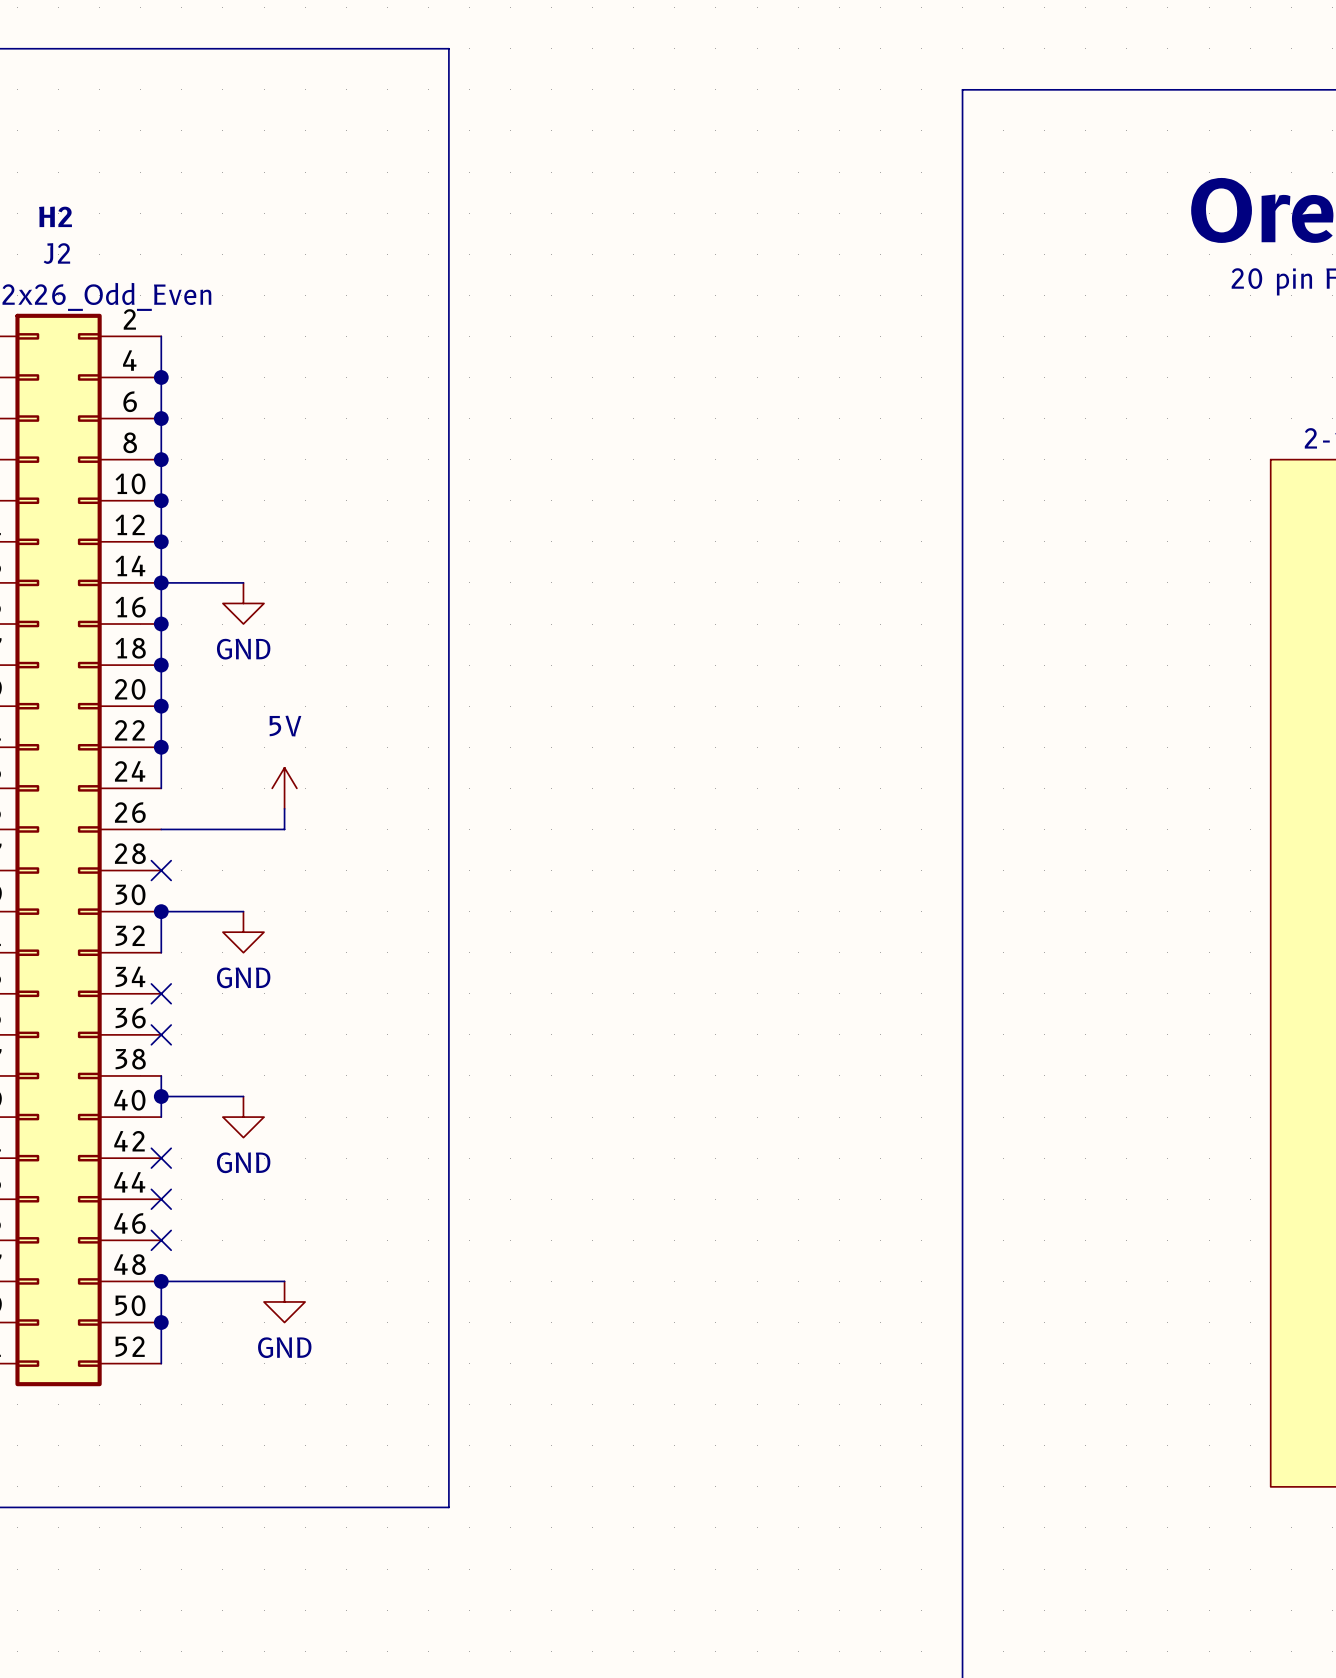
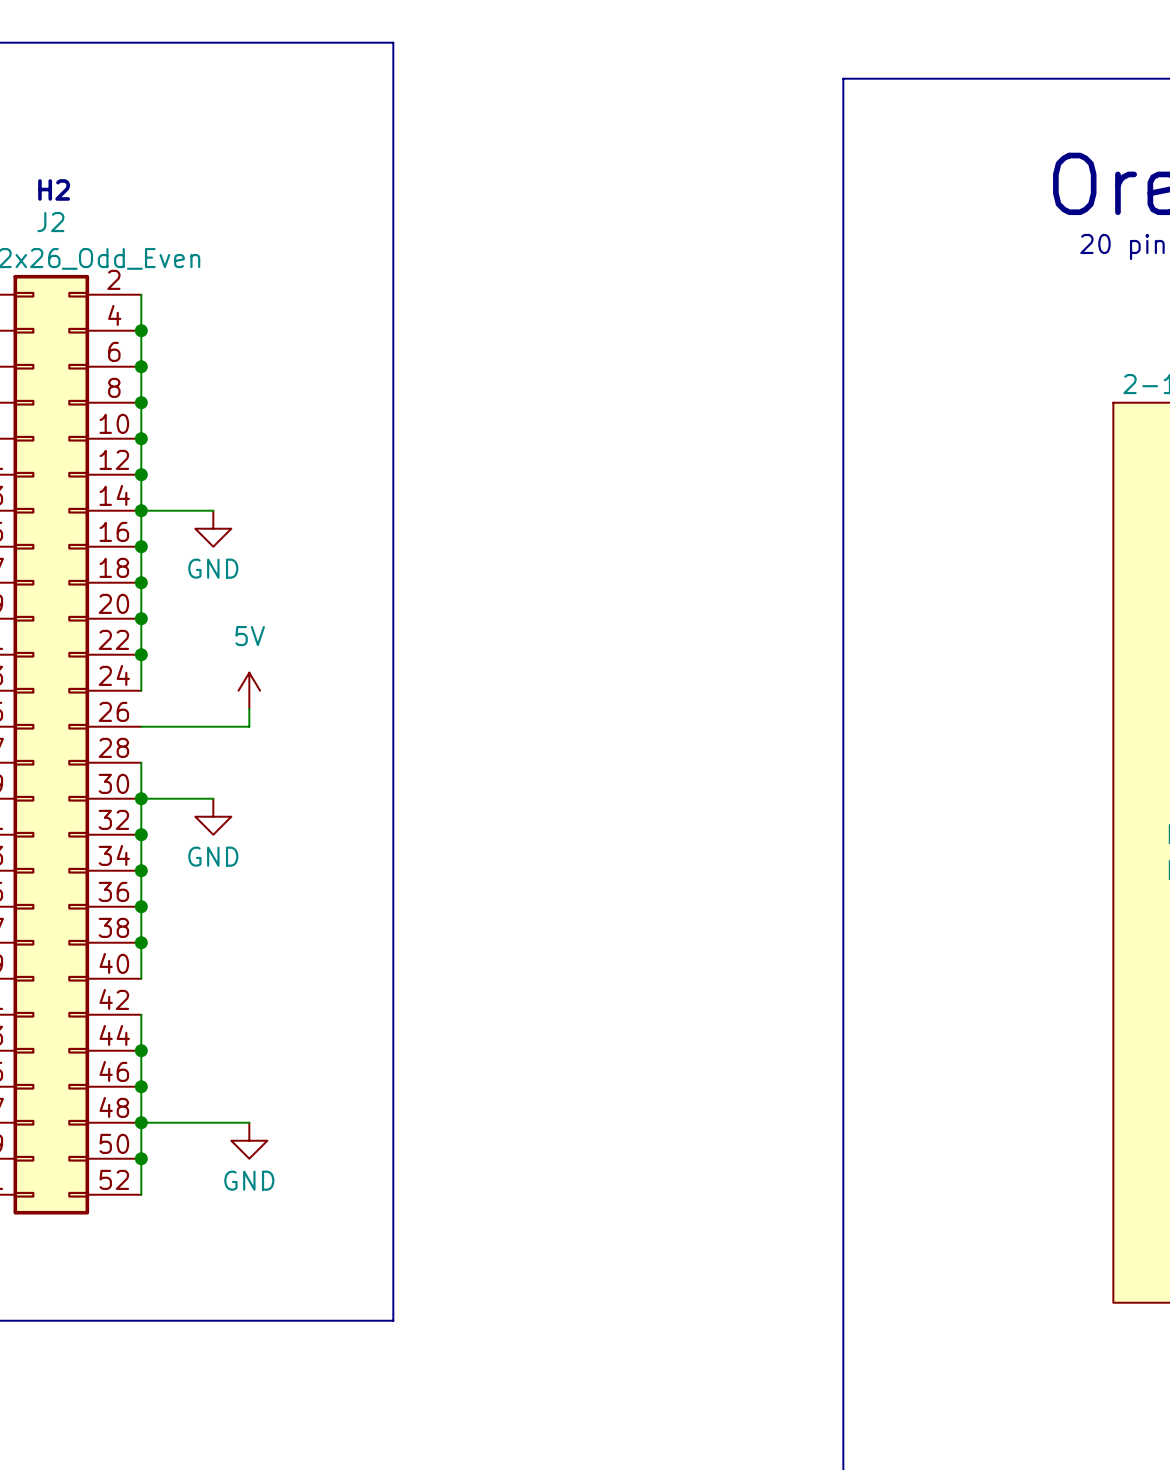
wire: none -> (141, 762) (141, 798)
no-connect mark: (161, 870) -> none
wire: none -> (141, 834) (141, 942)
junction: none -> (141, 834)
junction: none -> (141, 870)
no-connect mark: (161, 993) -> none
junction: none -> (141, 906)
no-connect mark: (161, 1034) -> none
wire: (161, 1096) (243, 1096) -> none
junction position: (161, 1096) -> (141, 942)
power symbol: GND (243, 1117) -> none
wire: none -> (141, 1014) (141, 1122)
no-connect mark: (161, 1158) -> none
junction: none -> (141, 1050)
no-connect mark: (161, 1199) -> none
junction: none -> (141, 1086)
no-connect mark: (161, 1240) -> none

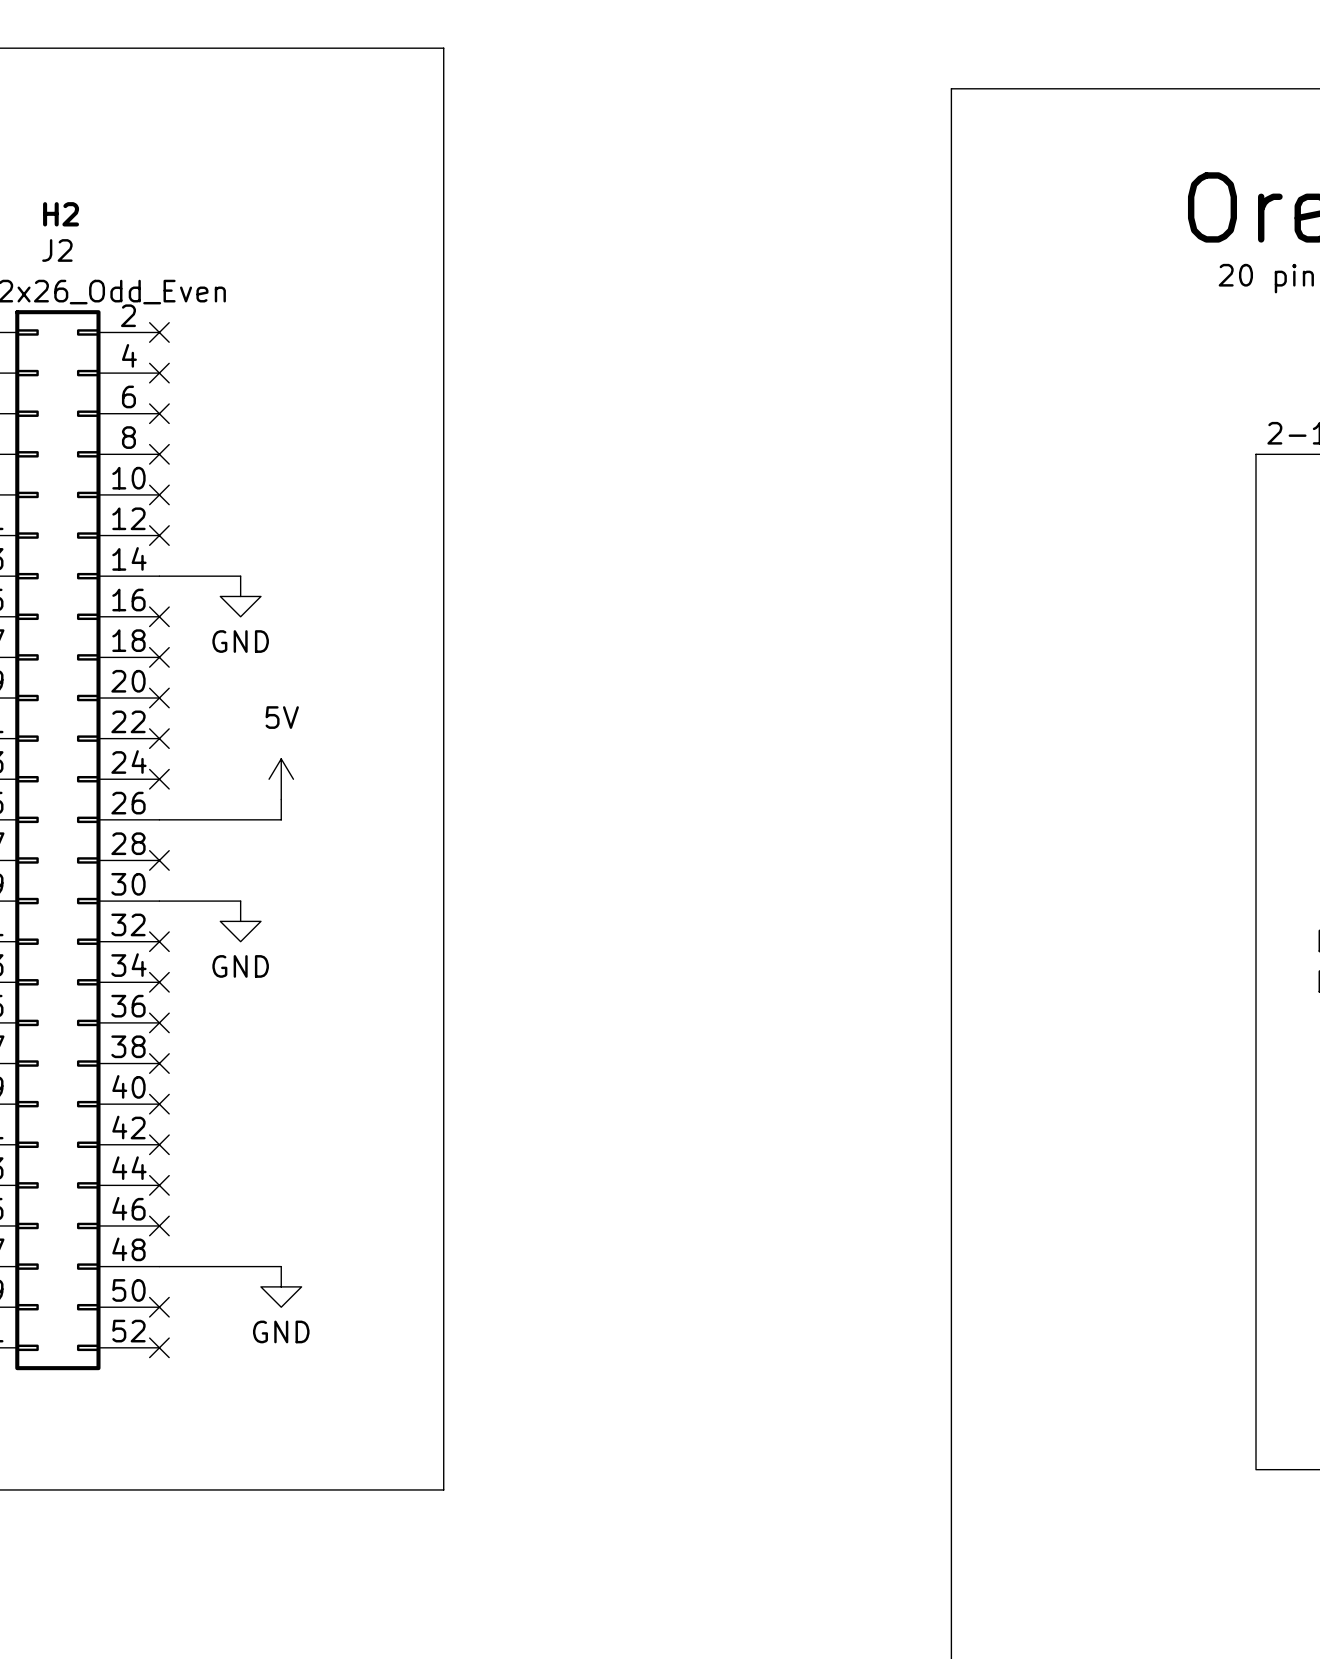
wire: (141, 294) (141, 690) -> none
no-connect mark: none -> (159, 332)
junction: (141, 330) -> none
no-connect mark: none -> (159, 373)
junction: (141, 366) -> none
no-connect mark: none -> (159, 413)
junction: (141, 402) -> none
no-connect mark: none -> (159, 454)
junction: (141, 438) -> none
no-connect mark: none -> (159, 494)
junction: (141, 474) -> none
no-connect mark: none -> (159, 535)
junction: (141, 510) -> none
junction: (141, 546) -> none
no-connect mark: none -> (159, 616)
junction: (141, 582) -> none
no-connect mark: none -> (159, 657)
junction: (141, 618) -> none
no-connect mark: none -> (159, 698)
junction: (141, 654) -> none
no-connect mark: none -> (159, 738)
no-connect mark: none -> (159, 779)
wire: (141, 762) (141, 978) -> none
no-connect mark: none -> (159, 860)
junction: (141, 798) -> none
junction: (141, 834) -> none
no-connect mark: none -> (159, 941)
junction: (141, 870) -> none
no-connect mark: none -> (159, 982)
junction: (141, 906) -> none
no-connect mark: none -> (159, 1022)
junction: (141, 942) -> none
no-connect mark: none -> (159, 1063)
no-connect mark: none -> (159, 1104)
wire: (141, 1014) (141, 1194) -> none
no-connect mark: none -> (159, 1144)
junction: (141, 1050) -> none
no-connect mark: none -> (159, 1185)
junction: (141, 1086) -> none
no-connect mark: none -> (159, 1225)
junction: (141, 1122) -> none
junction: (141, 1158) -> none
no-connect mark: none -> (159, 1307)
no-connect mark: none -> (159, 1347)

